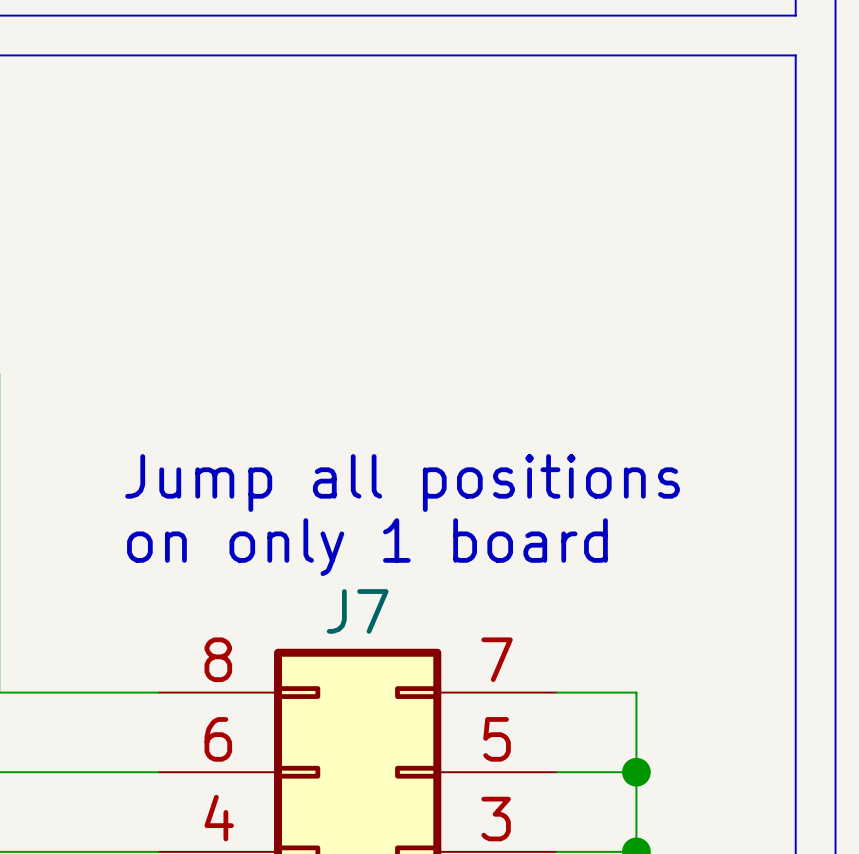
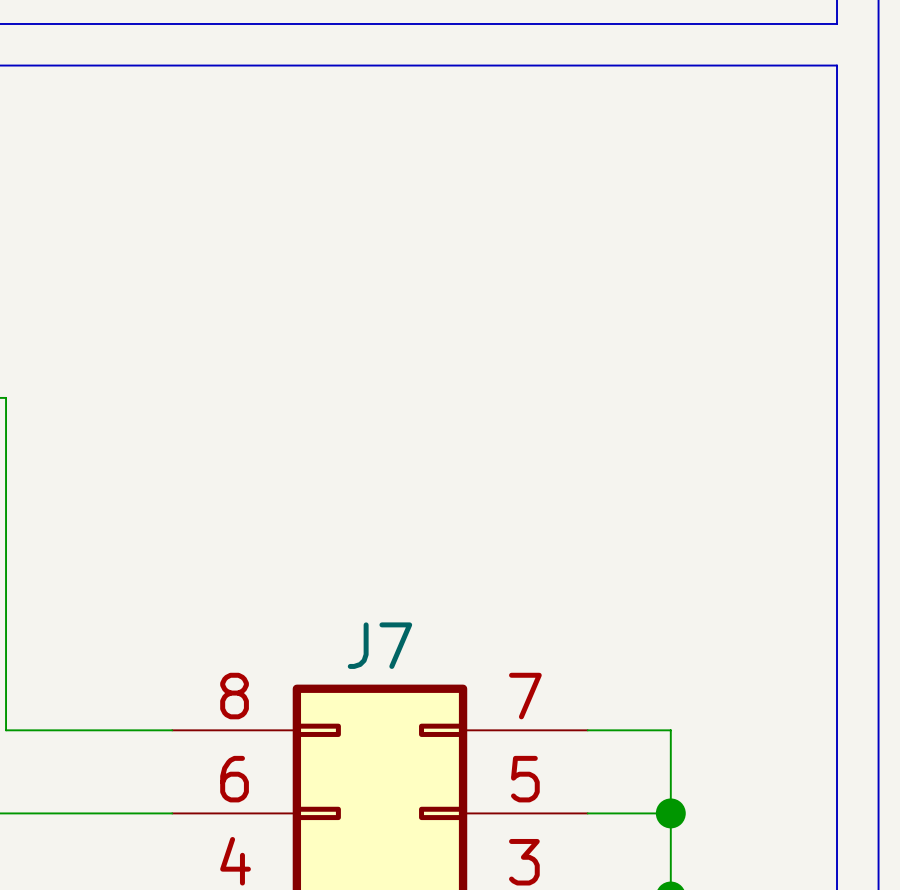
text: Jump all positions (402, 483) -> none
text: on only 1 board (367, 547) -> none

